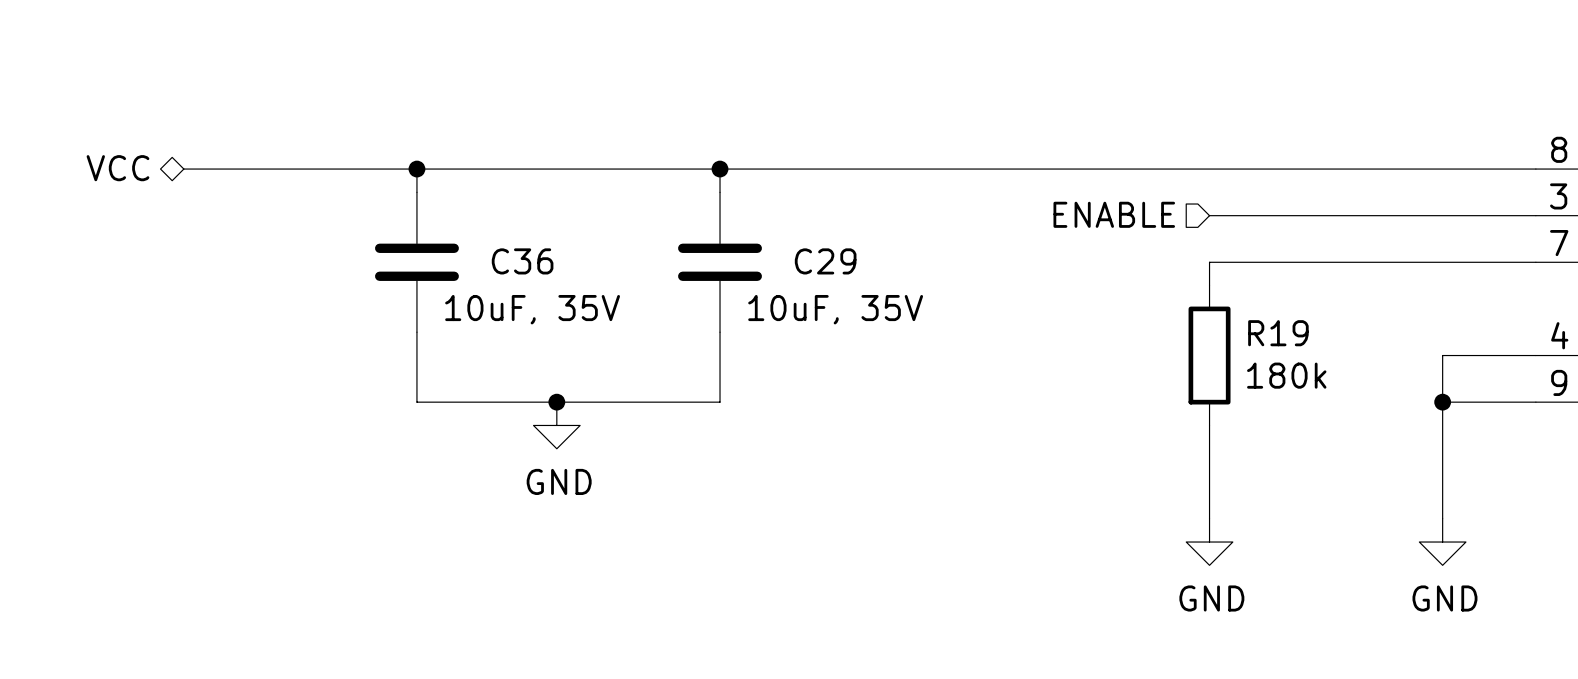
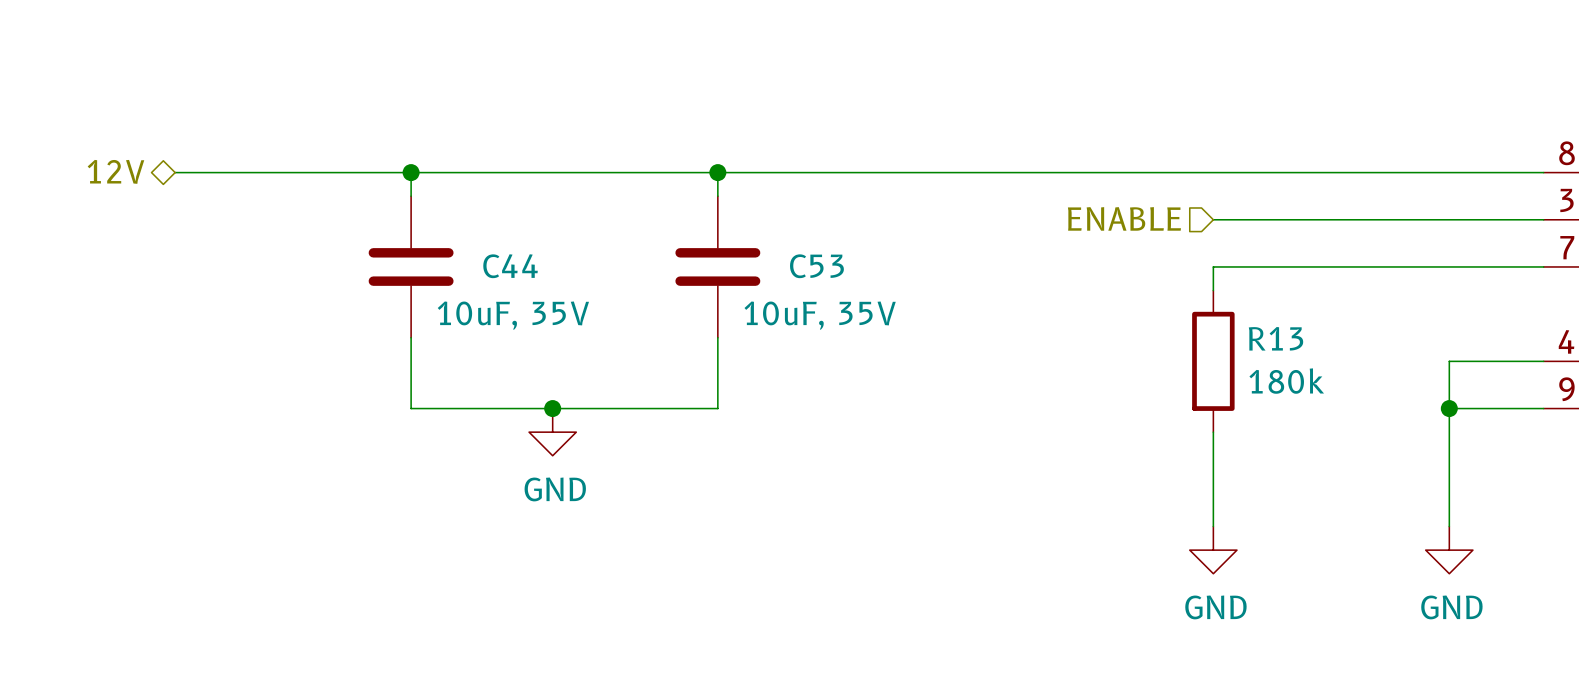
hierarchical label: VCC (117, 168) -> 12V (115, 171)
C36 name: C36 (522, 261) -> C44 (510, 266)
C29 name: C29 (825, 261) -> C53 (816, 266)
R19 name: R19 (1278, 333) -> R13 (1275, 338)

